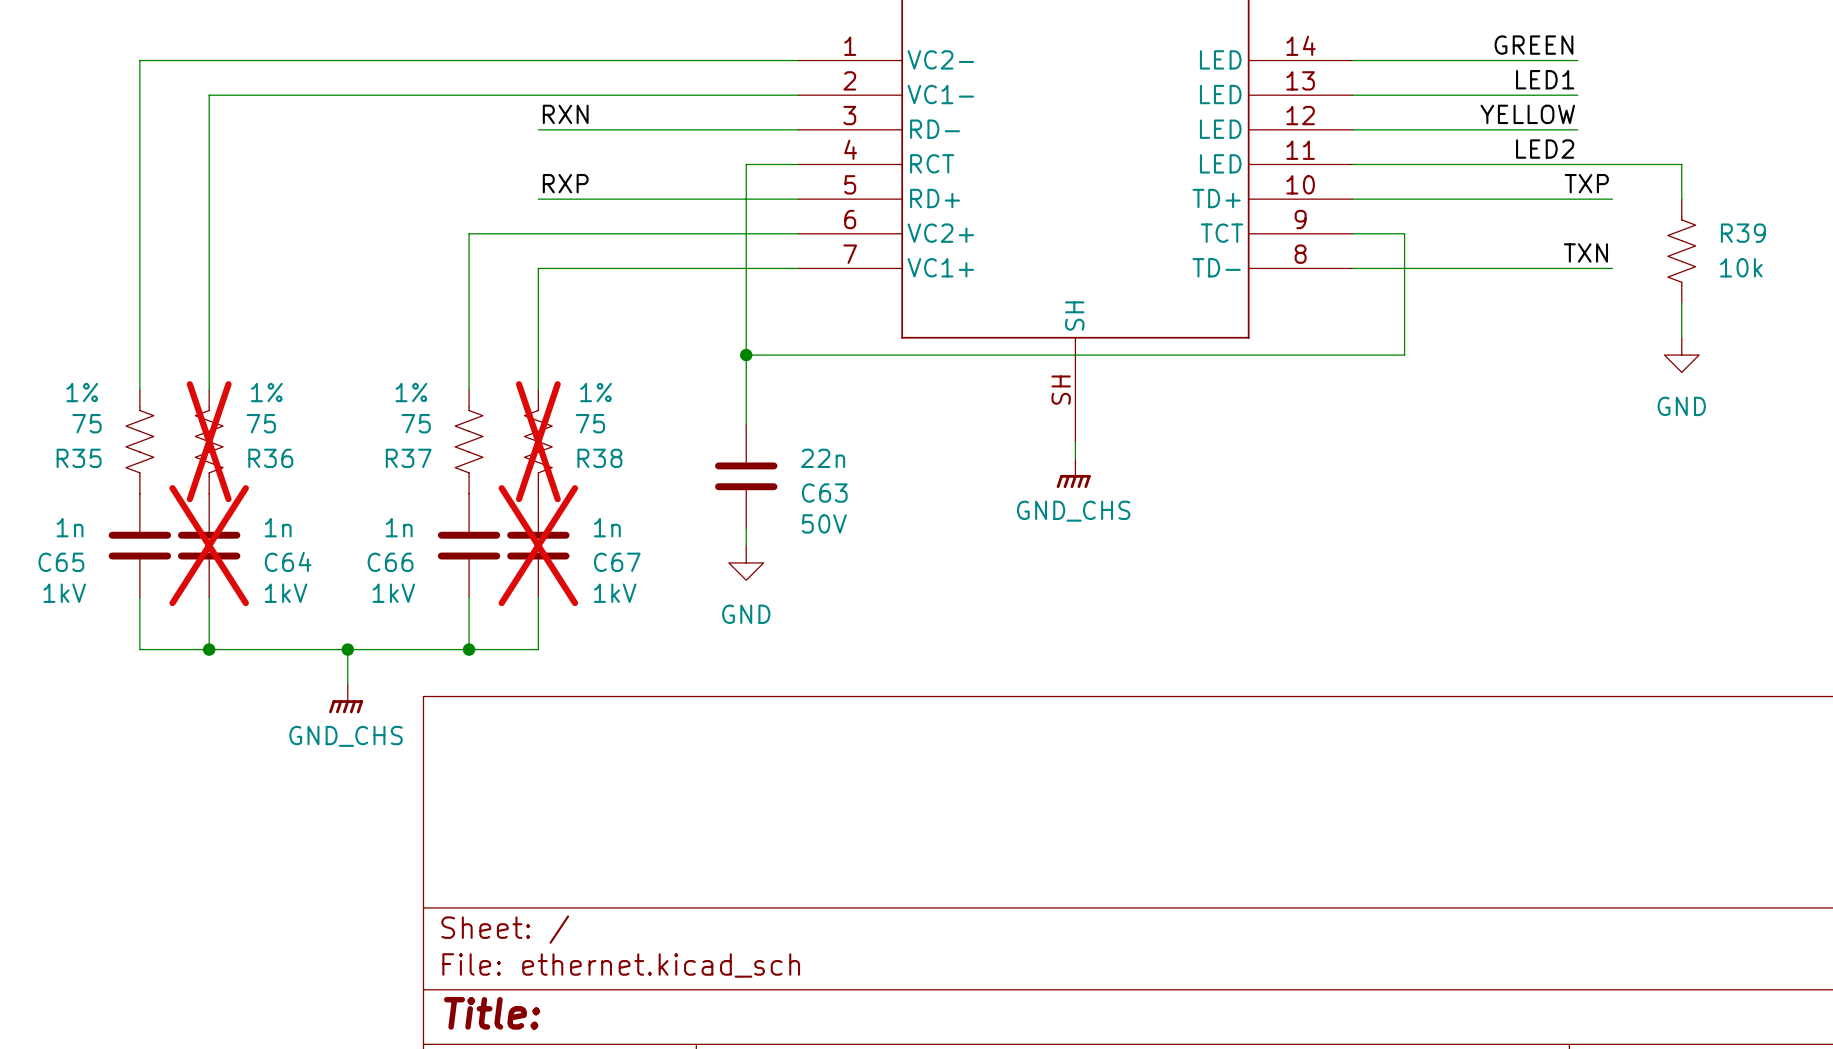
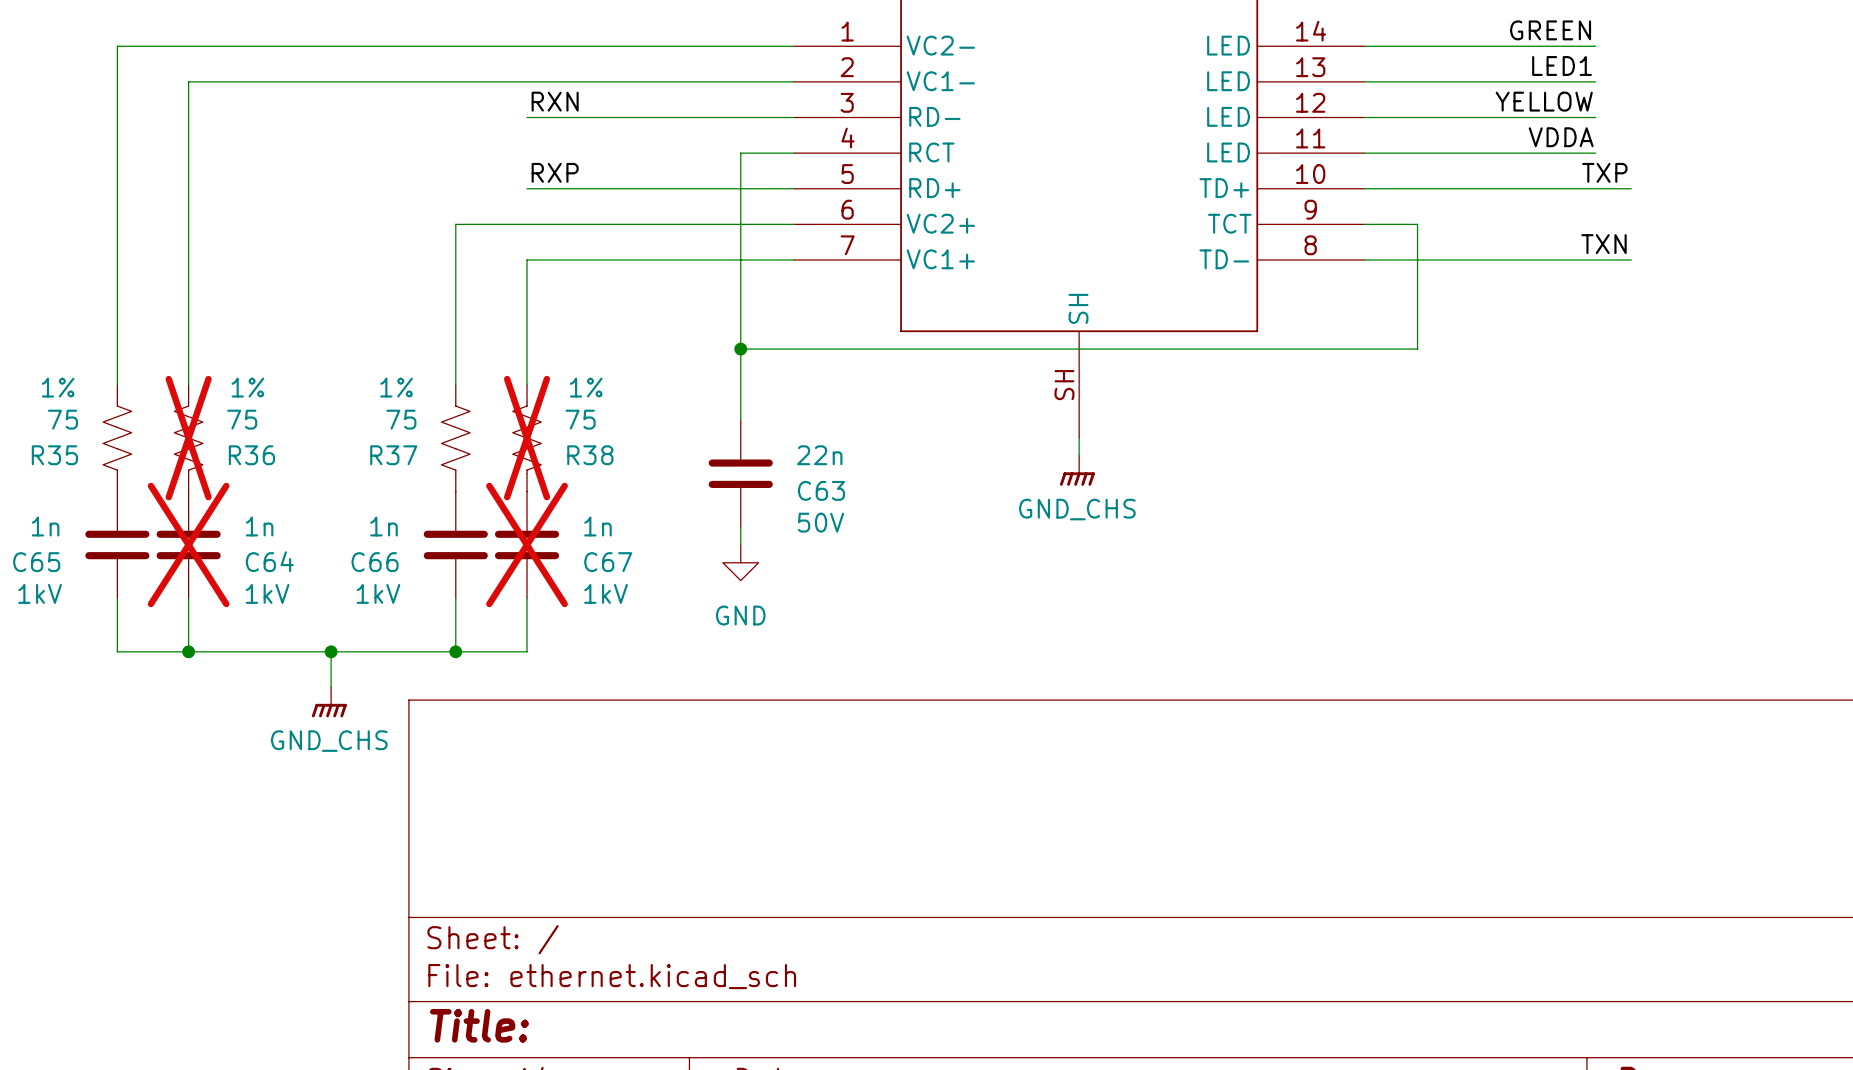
label: LED2 (1545, 149) -> VDDA (1561, 137)
wire: (1577, 164) (1681, 164) (1681, 199) -> none
R39: 10k (1681, 251) -> none
wire: (1681, 303) (1681, 337) -> none
power symbol: GND (1681, 355) -> none

